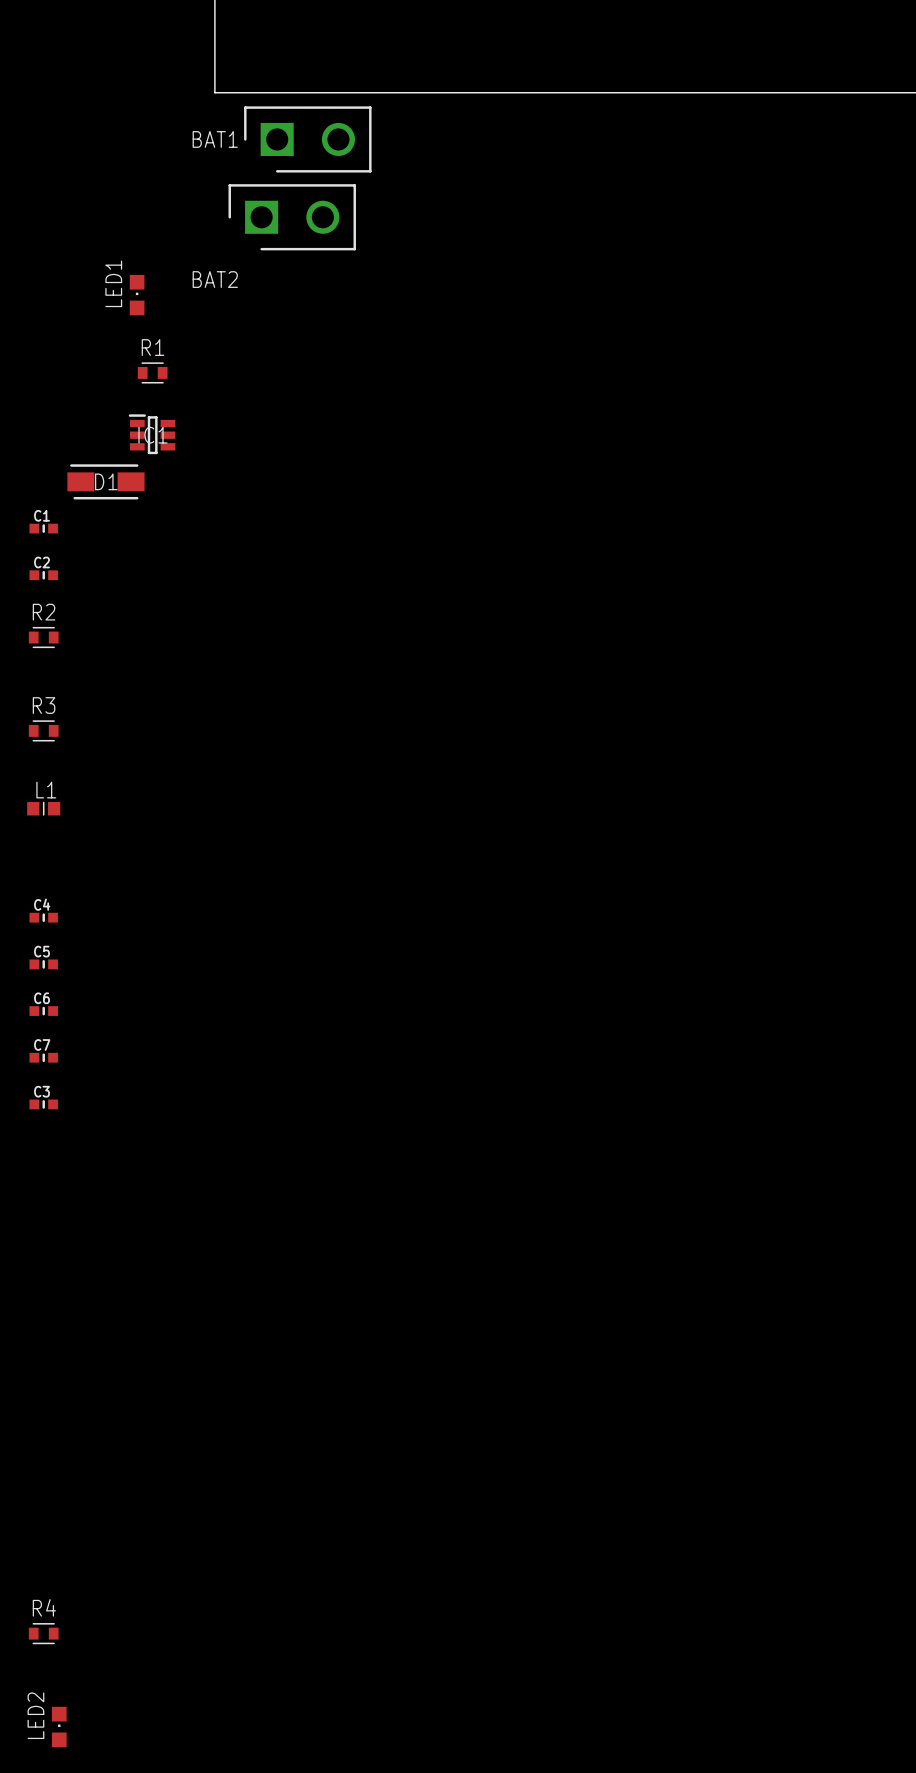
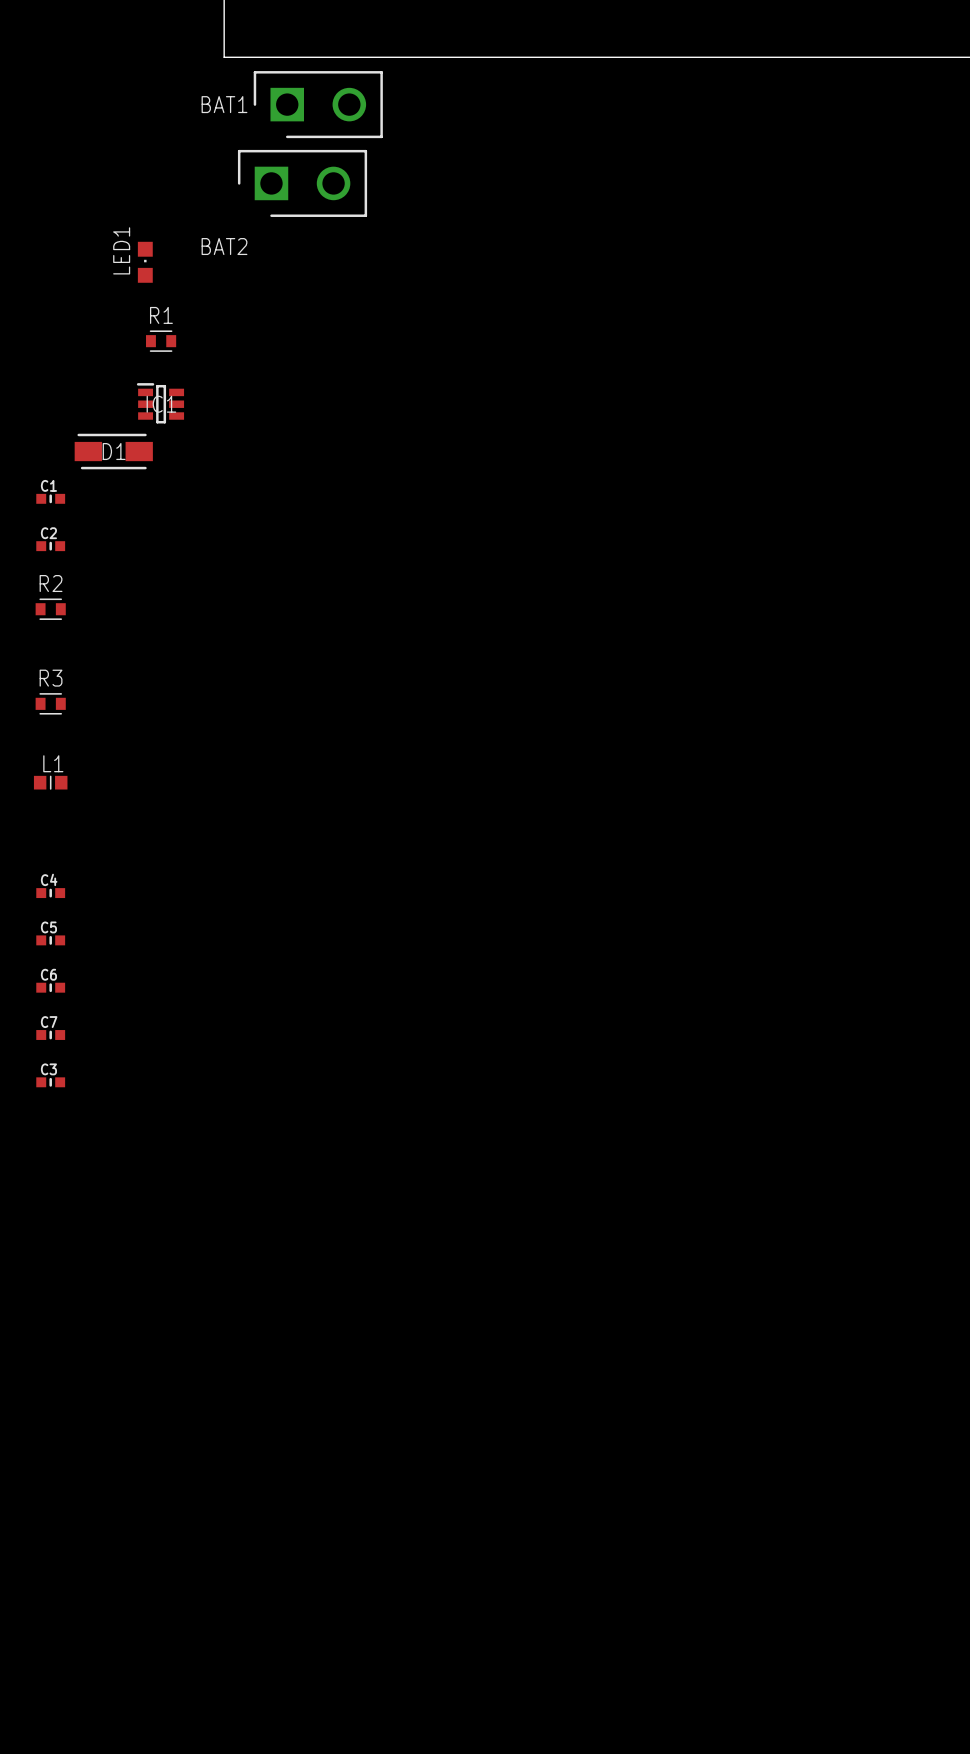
R4: (43, 1633) -> none
LED2: (59, 1727) -> none

